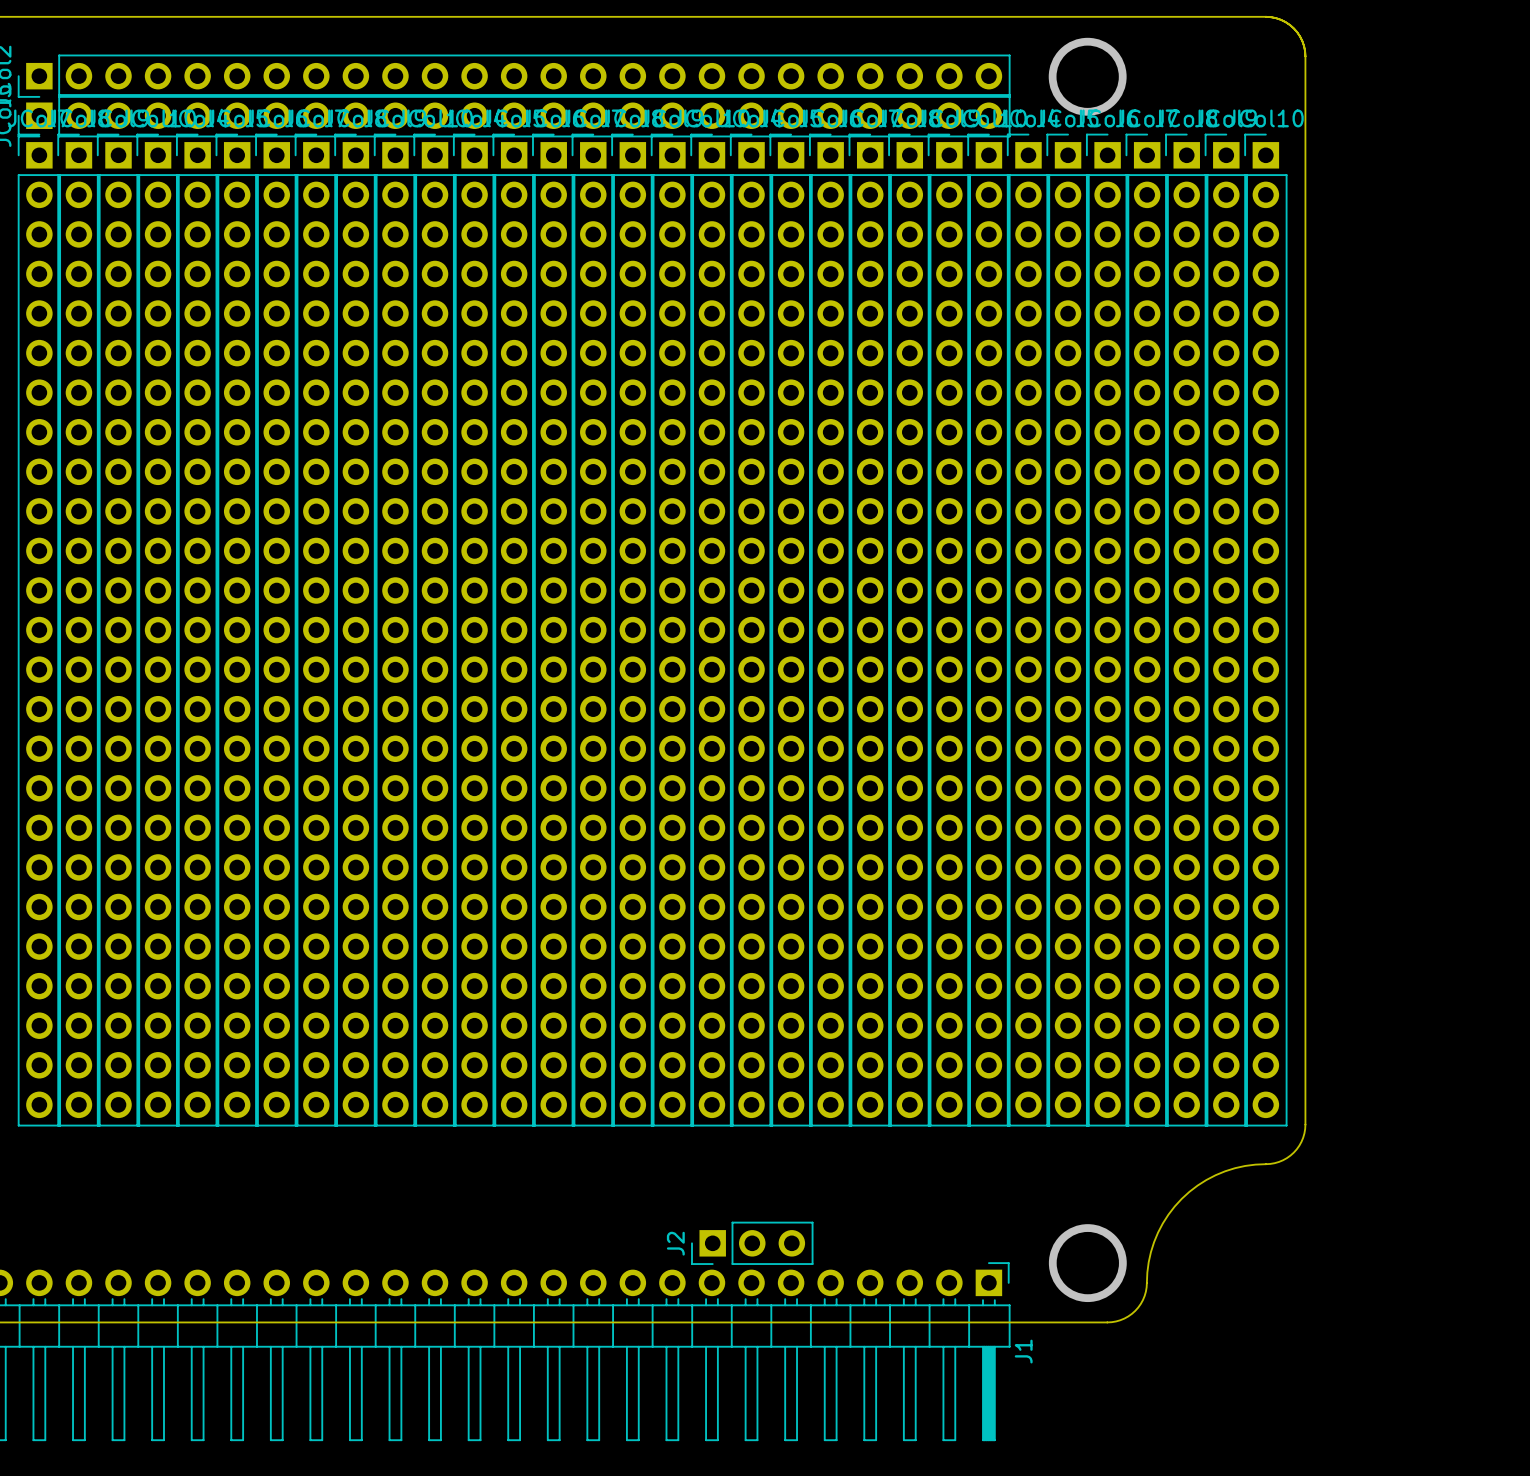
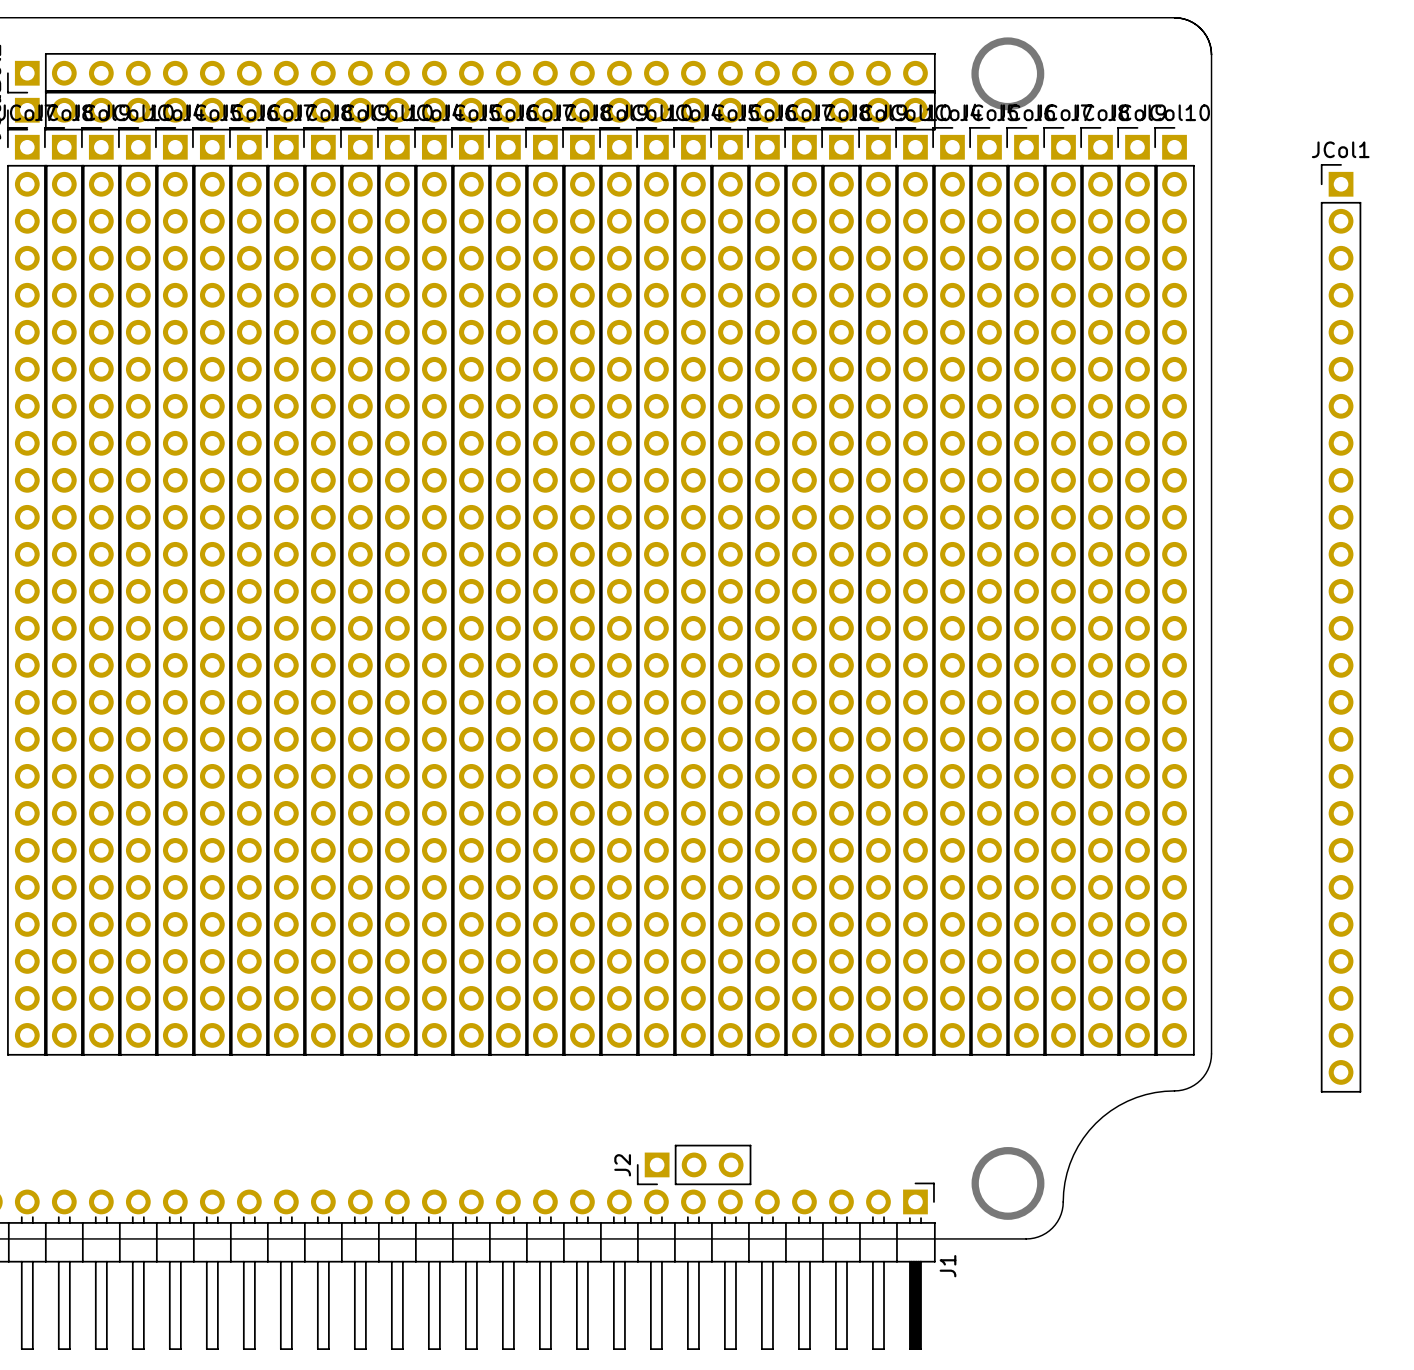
JCol1: none -> (1341, 628)

